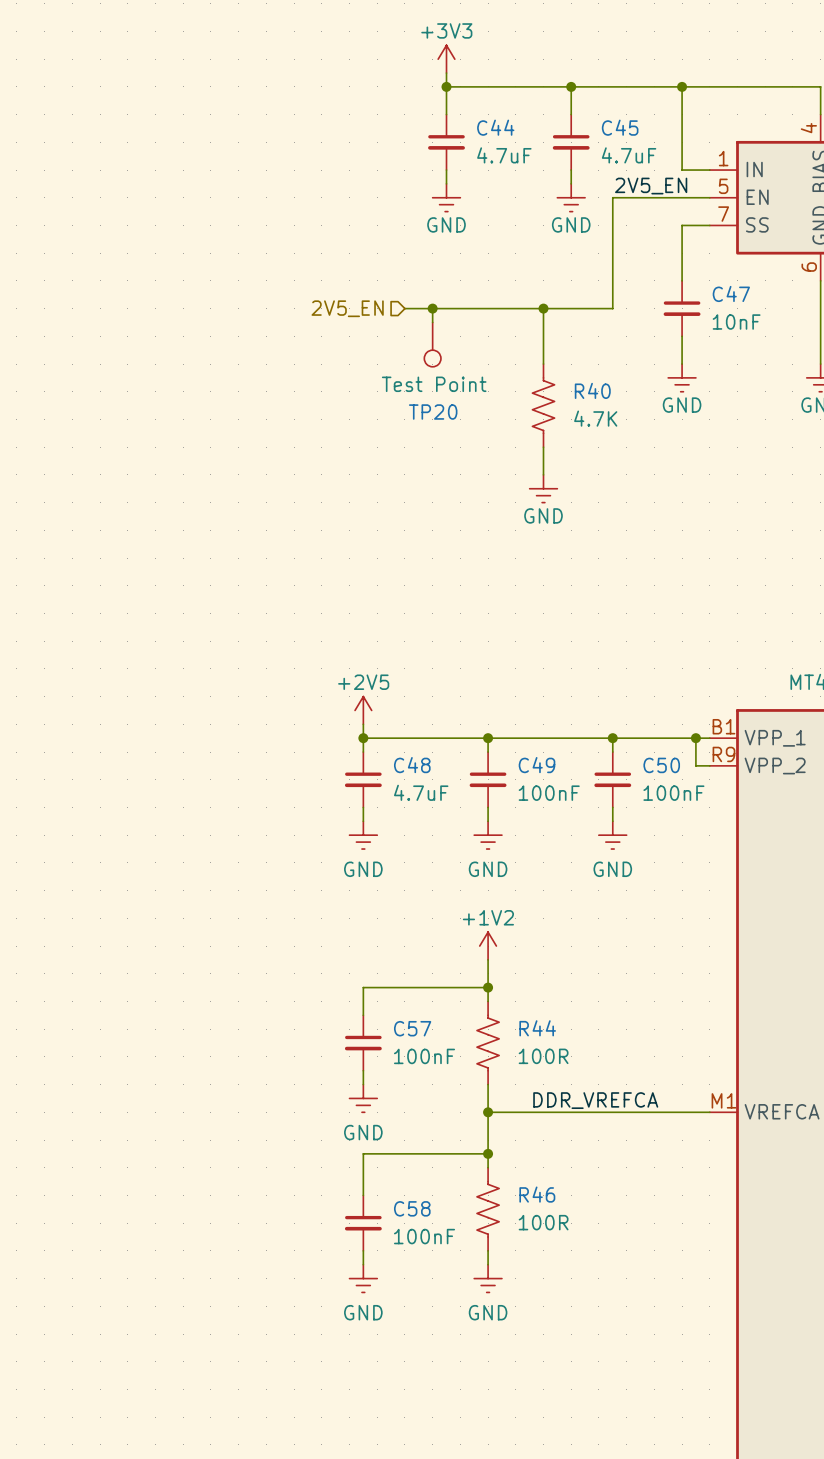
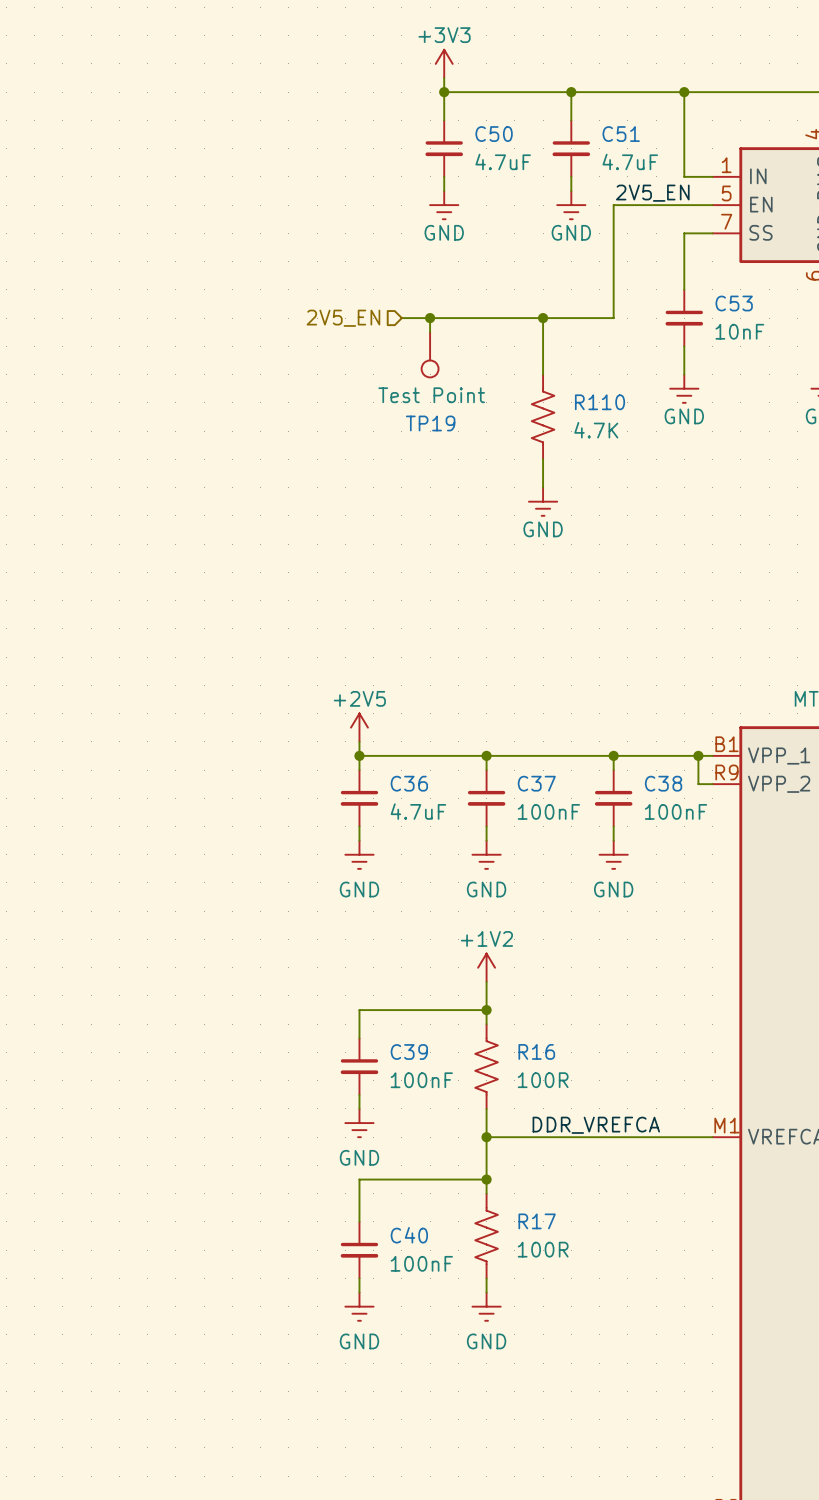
C44 name: C44 (495, 127) -> C50 (494, 134)
C45 name: C45 (620, 127) -> C51 (621, 134)
C47 name: C47 (731, 293) -> C53 (734, 303)
R40 name: R40 (592, 390) -> R110 (599, 402)
TP20 name: TP20 (433, 412) -> TP19 (430, 423)
C48 name: C48 (412, 765) -> C36 (409, 783)
C49 name: C49 (537, 765) -> C37 (536, 783)
C50 name: C50 (661, 765) -> C38 (663, 783)
C57 name: C57 (412, 1028) -> C39 (409, 1052)
R44 name: R44 (537, 1028) -> R16 (536, 1051)
R46 name: R46 (537, 1194) -> R17 (537, 1221)
C58 name: C58 (412, 1208) -> C40 (409, 1235)

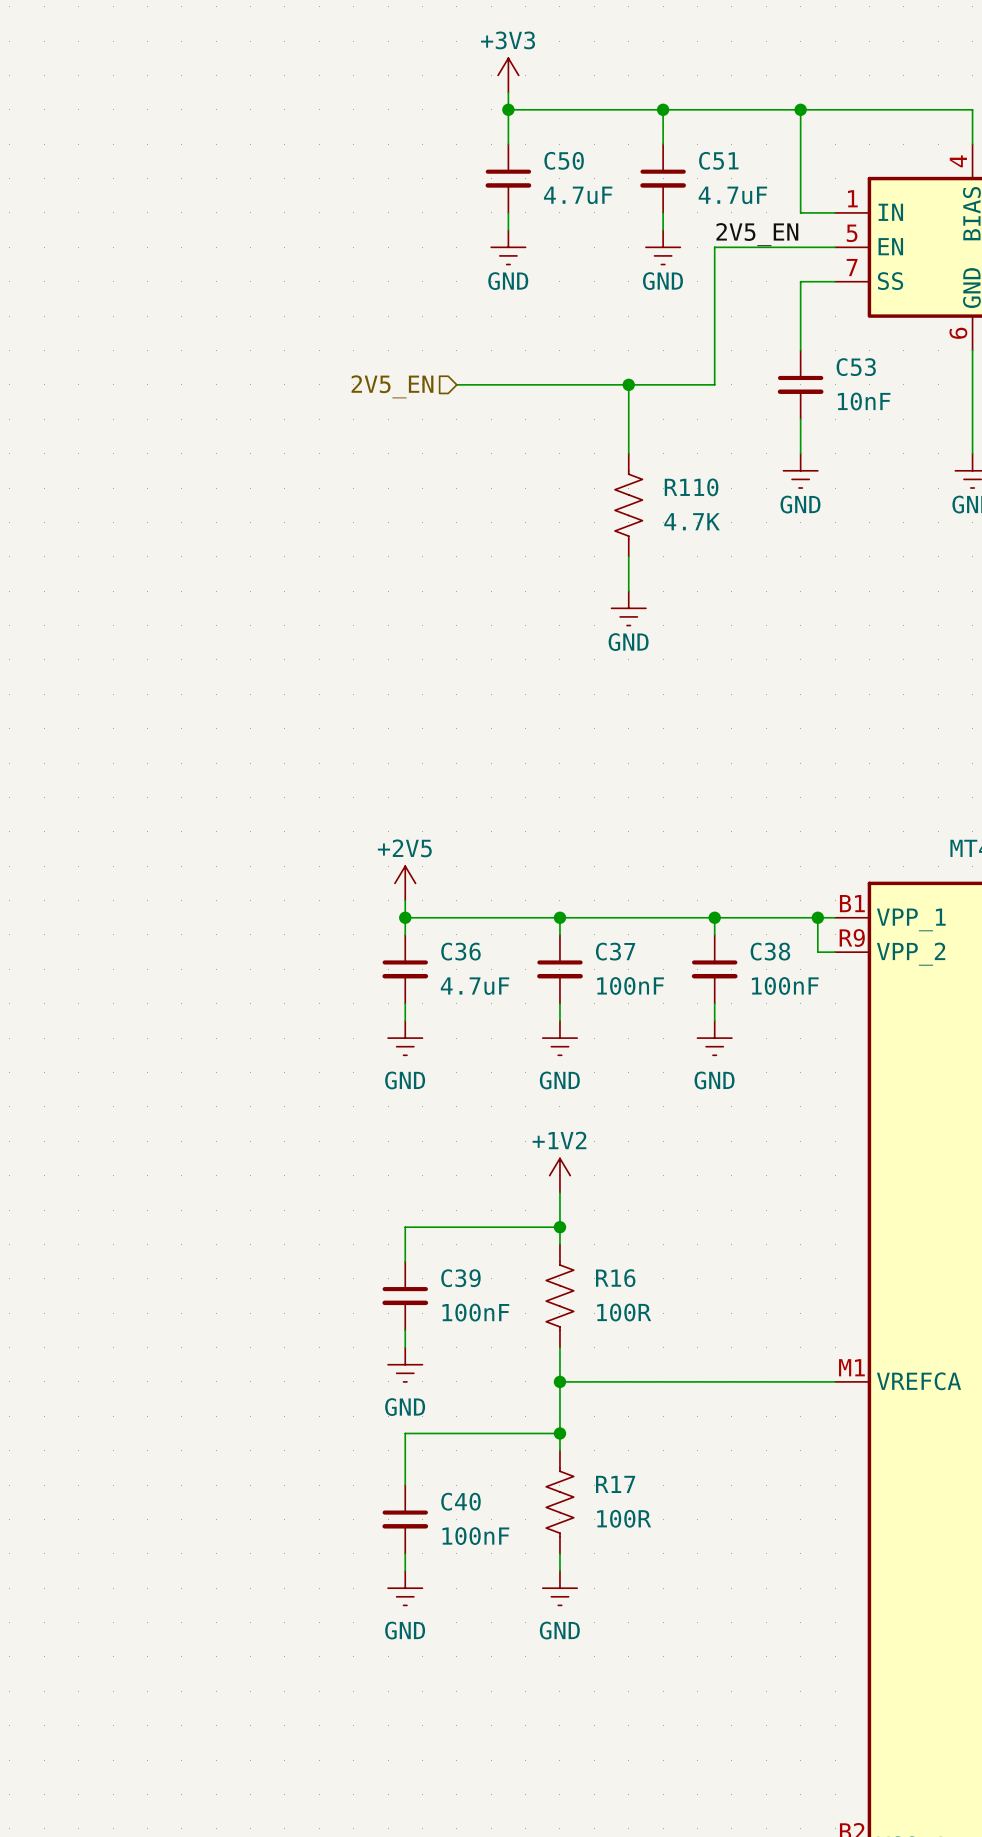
wire: (430, 318) (430, 332) -> none
junction: (430, 318) -> none
TP19: Test Point (430, 354) -> none
label: DDR_VREFCA (596, 1125) -> none

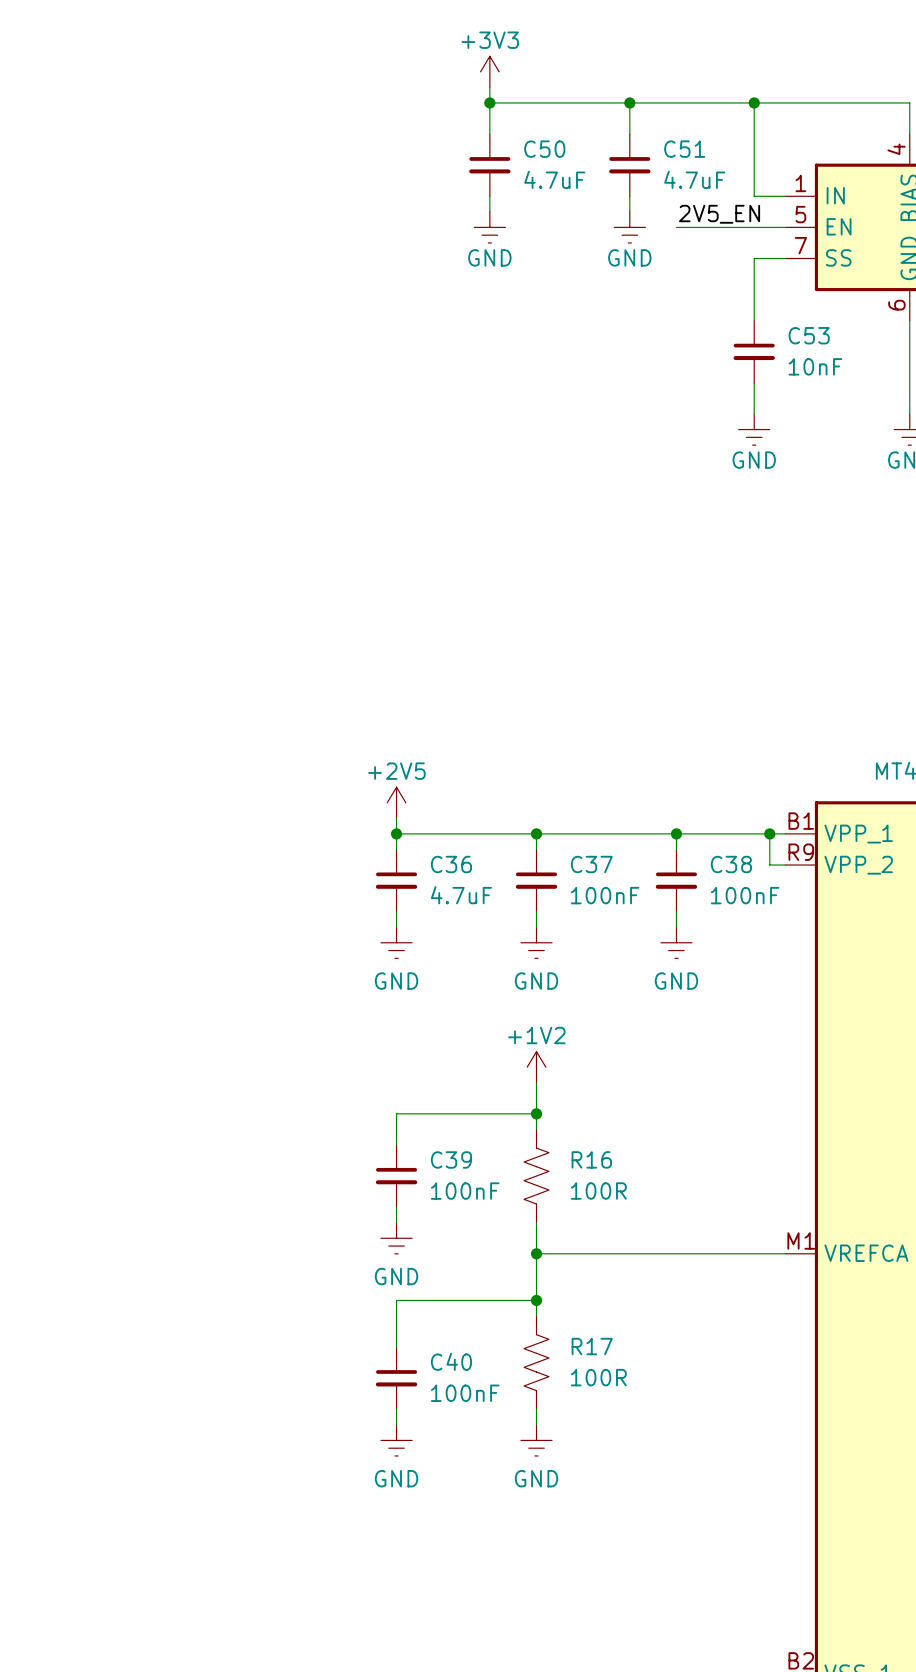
wire: (714, 247) (714, 384) (456, 384) -> none
wire: (628, 384) (628, 453) -> none
junction: (628, 384) -> none
hierarchical label: 2V5_EN (392, 386) -> none
R110: 4.7K (628, 505) -> none
wire: (628, 556) (628, 591) -> none
power symbol: GND (628, 608) -> none

